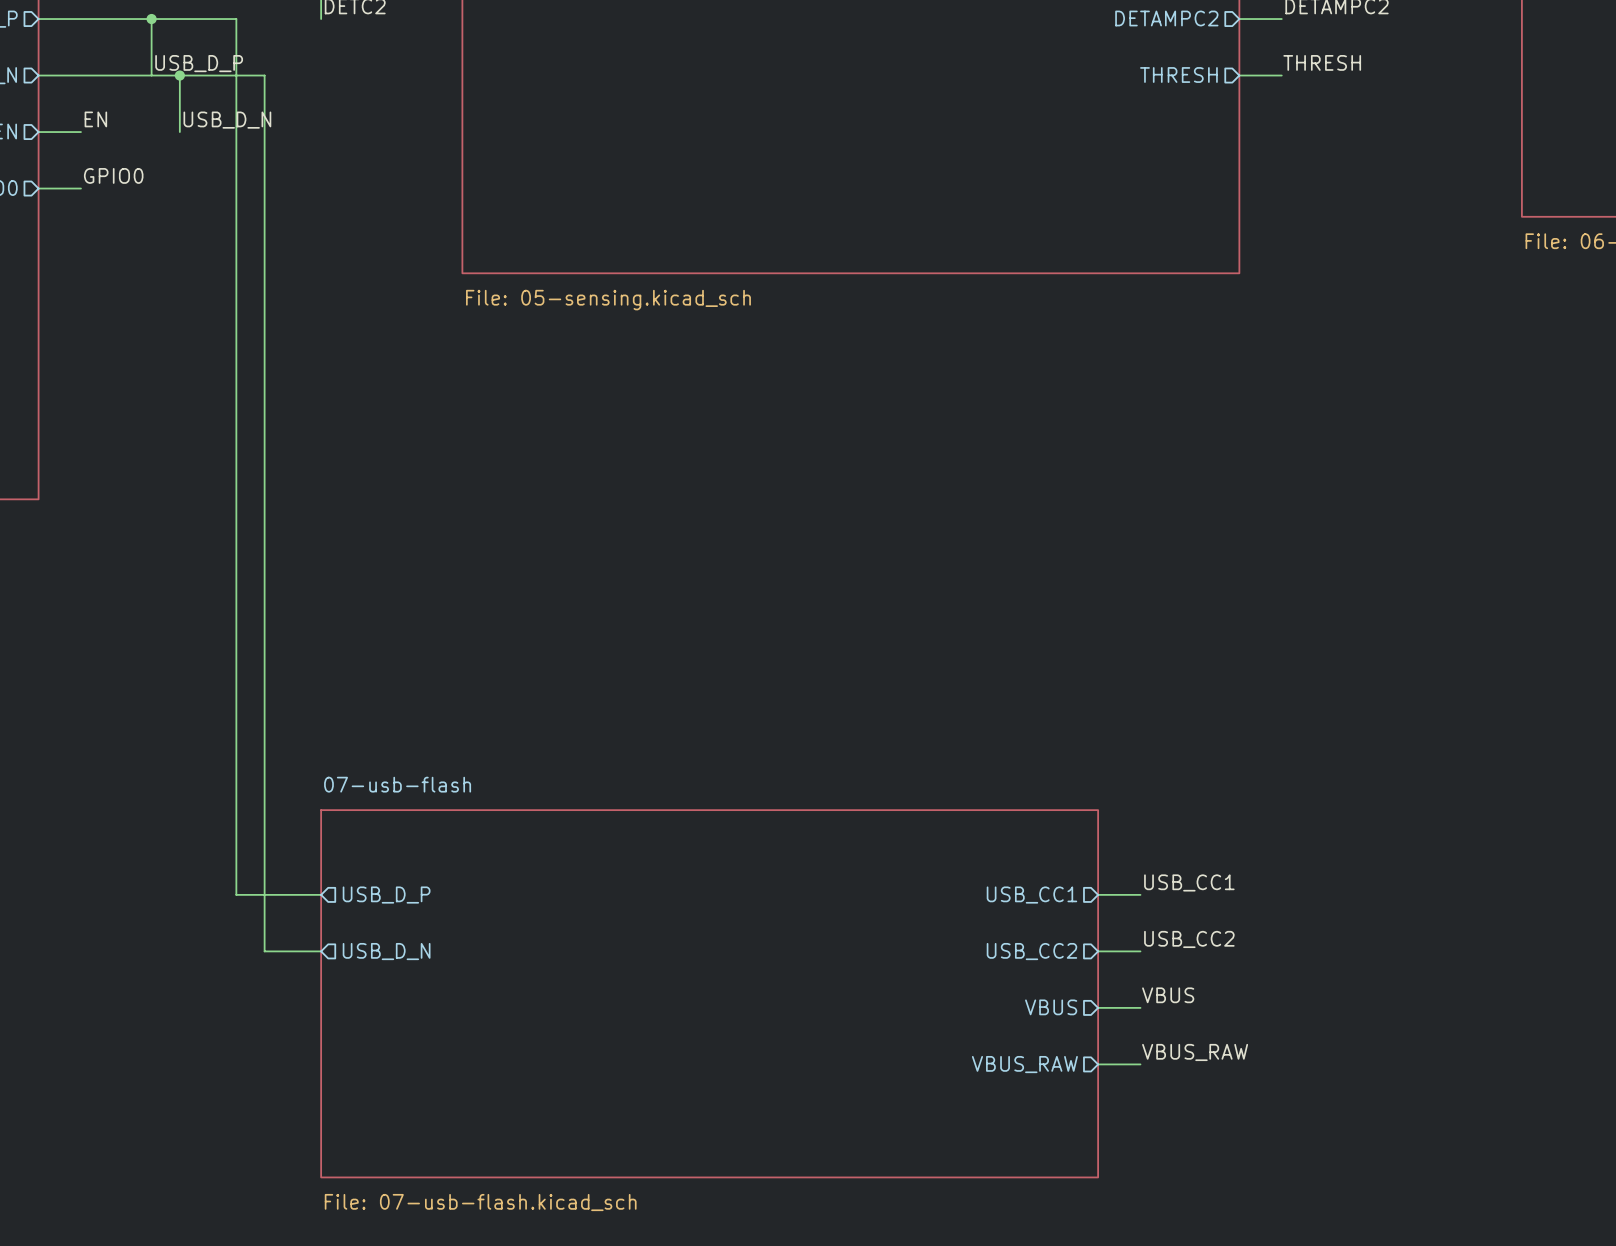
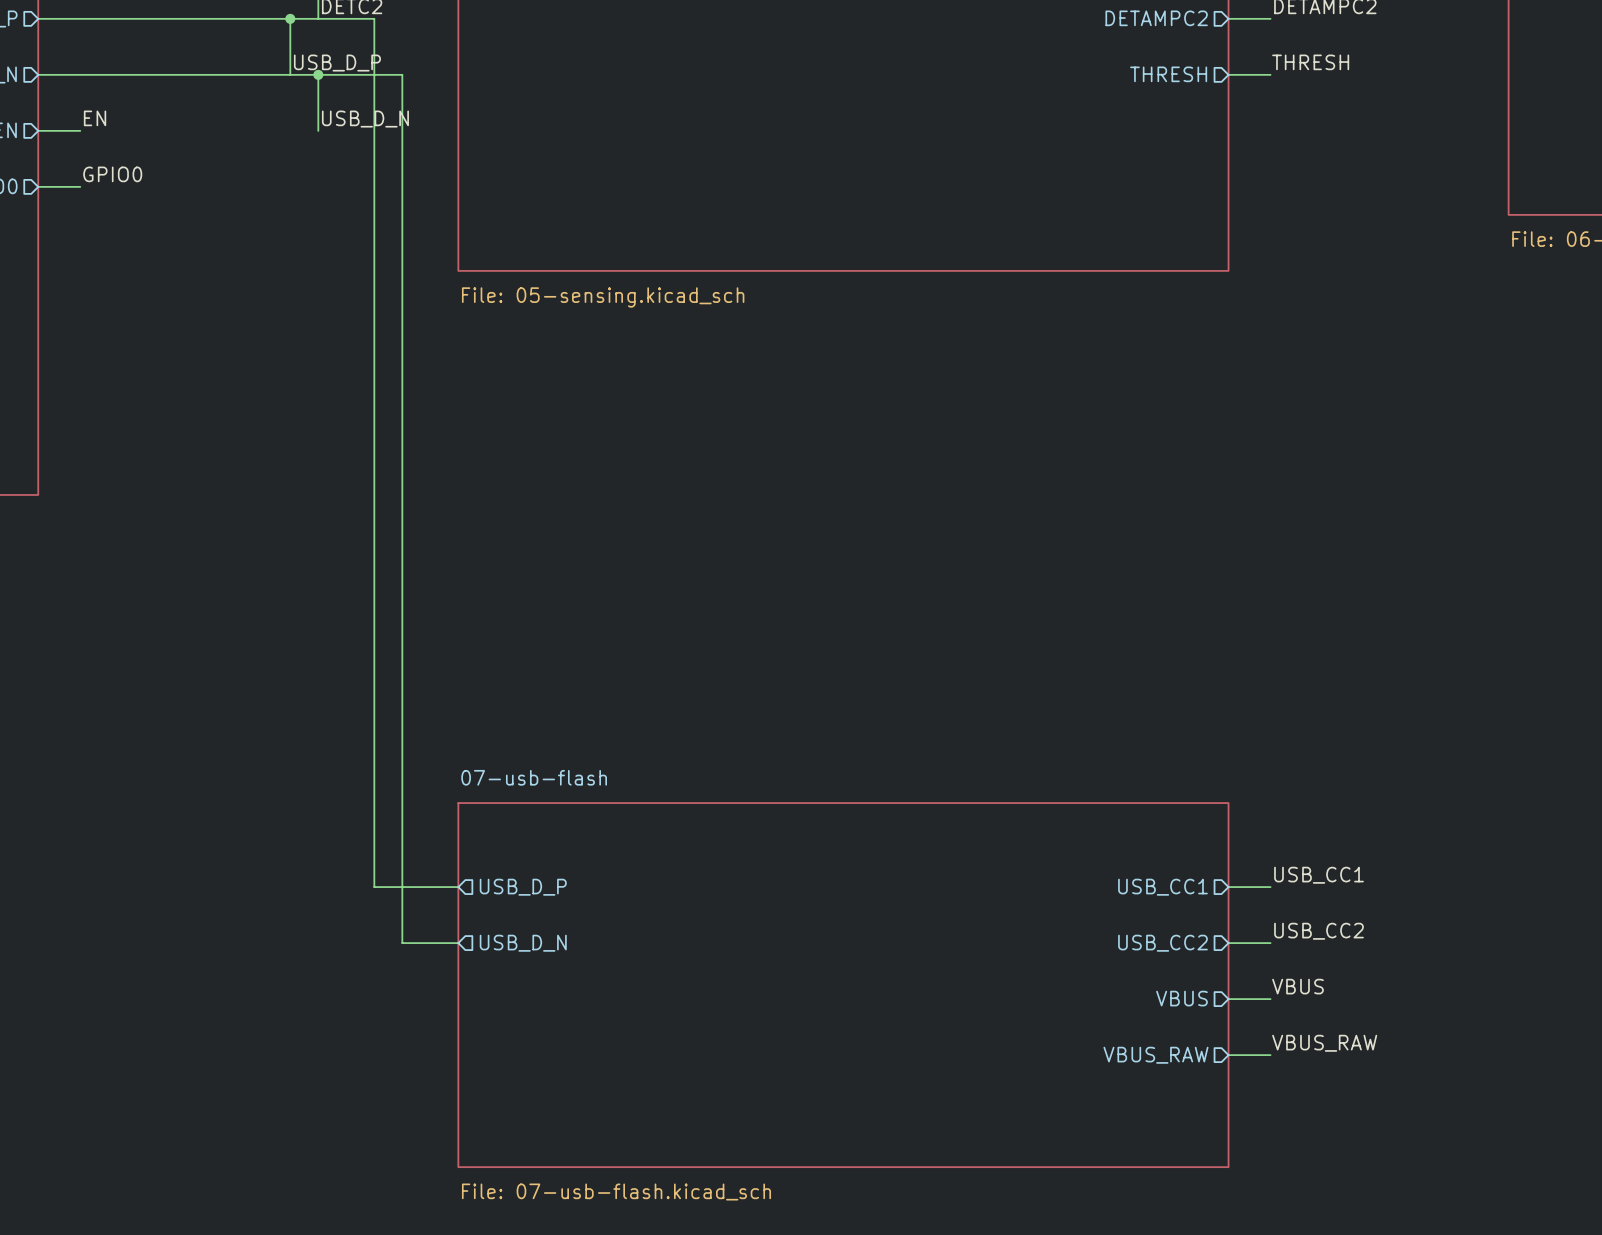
wire: (151, 19) (151, 75) -> (290, 18) (290, 74)
junction: (151, 19) -> none
wire: (236, 19) (236, 894) (321, 894) -> (234, 18) (374, 18) (374, 887) (458, 887)
junction: none -> (290, 18)
label position: USB_D_P (199, 63) -> USB_D_P (337, 63)
wire: (179, 75) (179, 132) -> (318, 74) (318, 130)
junction: (179, 75) -> none
wire: (264, 75) (264, 951) (321, 951) -> (262, 74) (402, 74) (402, 943) (458, 943)
junction: none -> (318, 74)
label position: USB_D_N (227, 120) -> USB_D_N (365, 119)
label position: USB_CC1 (1189, 882) -> USB_CC1 (1318, 875)
wire: (1098, 894) (1140, 894) -> (1228, 887) (1270, 887)
sheet pin position: USB_D_P (386, 895) -> USB_D_P (523, 887)
sheet pin position: USB_CC1 (1031, 895) -> USB_CC1 (1162, 887)
label position: USB_CC2 (1189, 939) -> USB_CC2 (1318, 931)
sheet pin position: USB_D_N (386, 951) -> USB_D_N (523, 943)
sheet pin position: USB_CC2 (1031, 951) -> USB_CC2 (1162, 943)
wire: (1098, 951) (1140, 951) -> (1228, 943) (1270, 943)
sheet 07-usb-flash position: (709, 993) -> (843, 985)
label position: VBUS (1168, 995) -> VBUS (1297, 986)
sheet pin position: VBUS (1051, 1007) -> VBUS (1181, 998)
wire: (1098, 1007) (1140, 1007) -> (1228, 999) (1270, 999)
label position: VBUS_RAW (1195, 1052) -> VBUS_RAW (1324, 1043)
sheet pin position: VBUS_RAW (1024, 1064) -> VBUS_RAW (1155, 1055)
wire: (1098, 1064) (1140, 1064) -> (1228, 1055) (1270, 1055)

